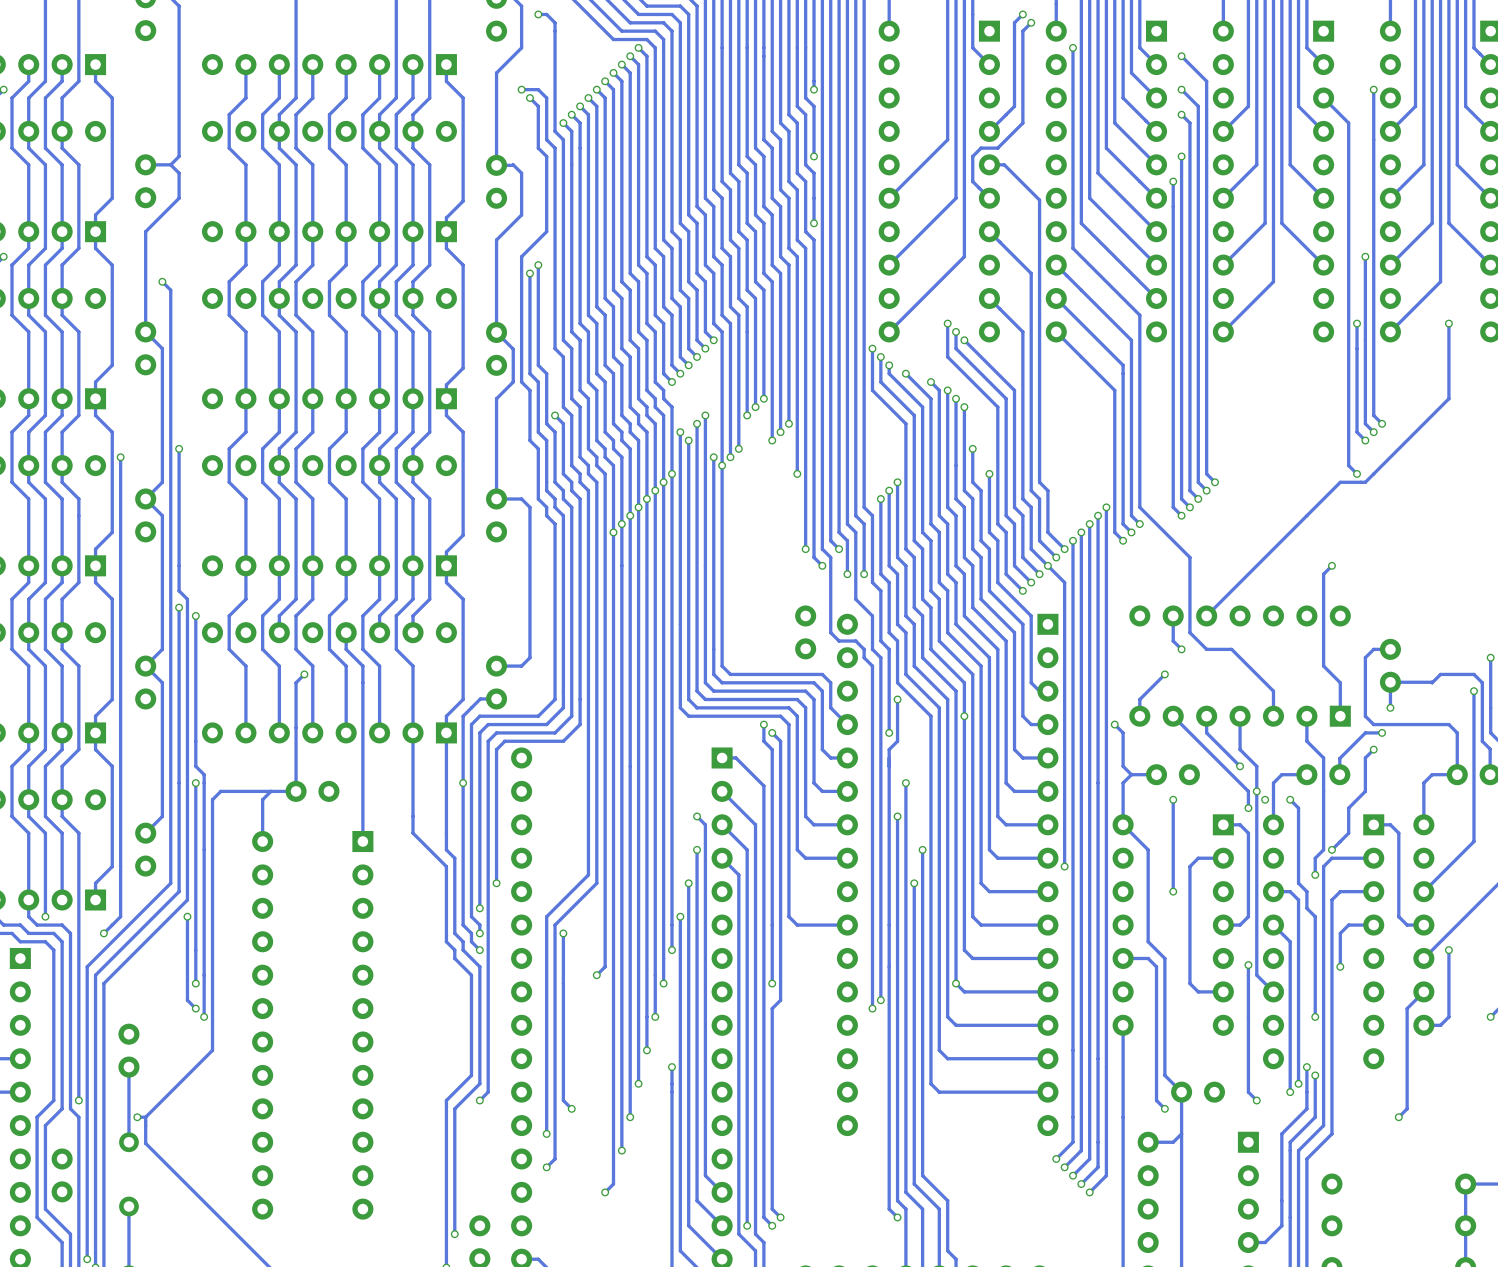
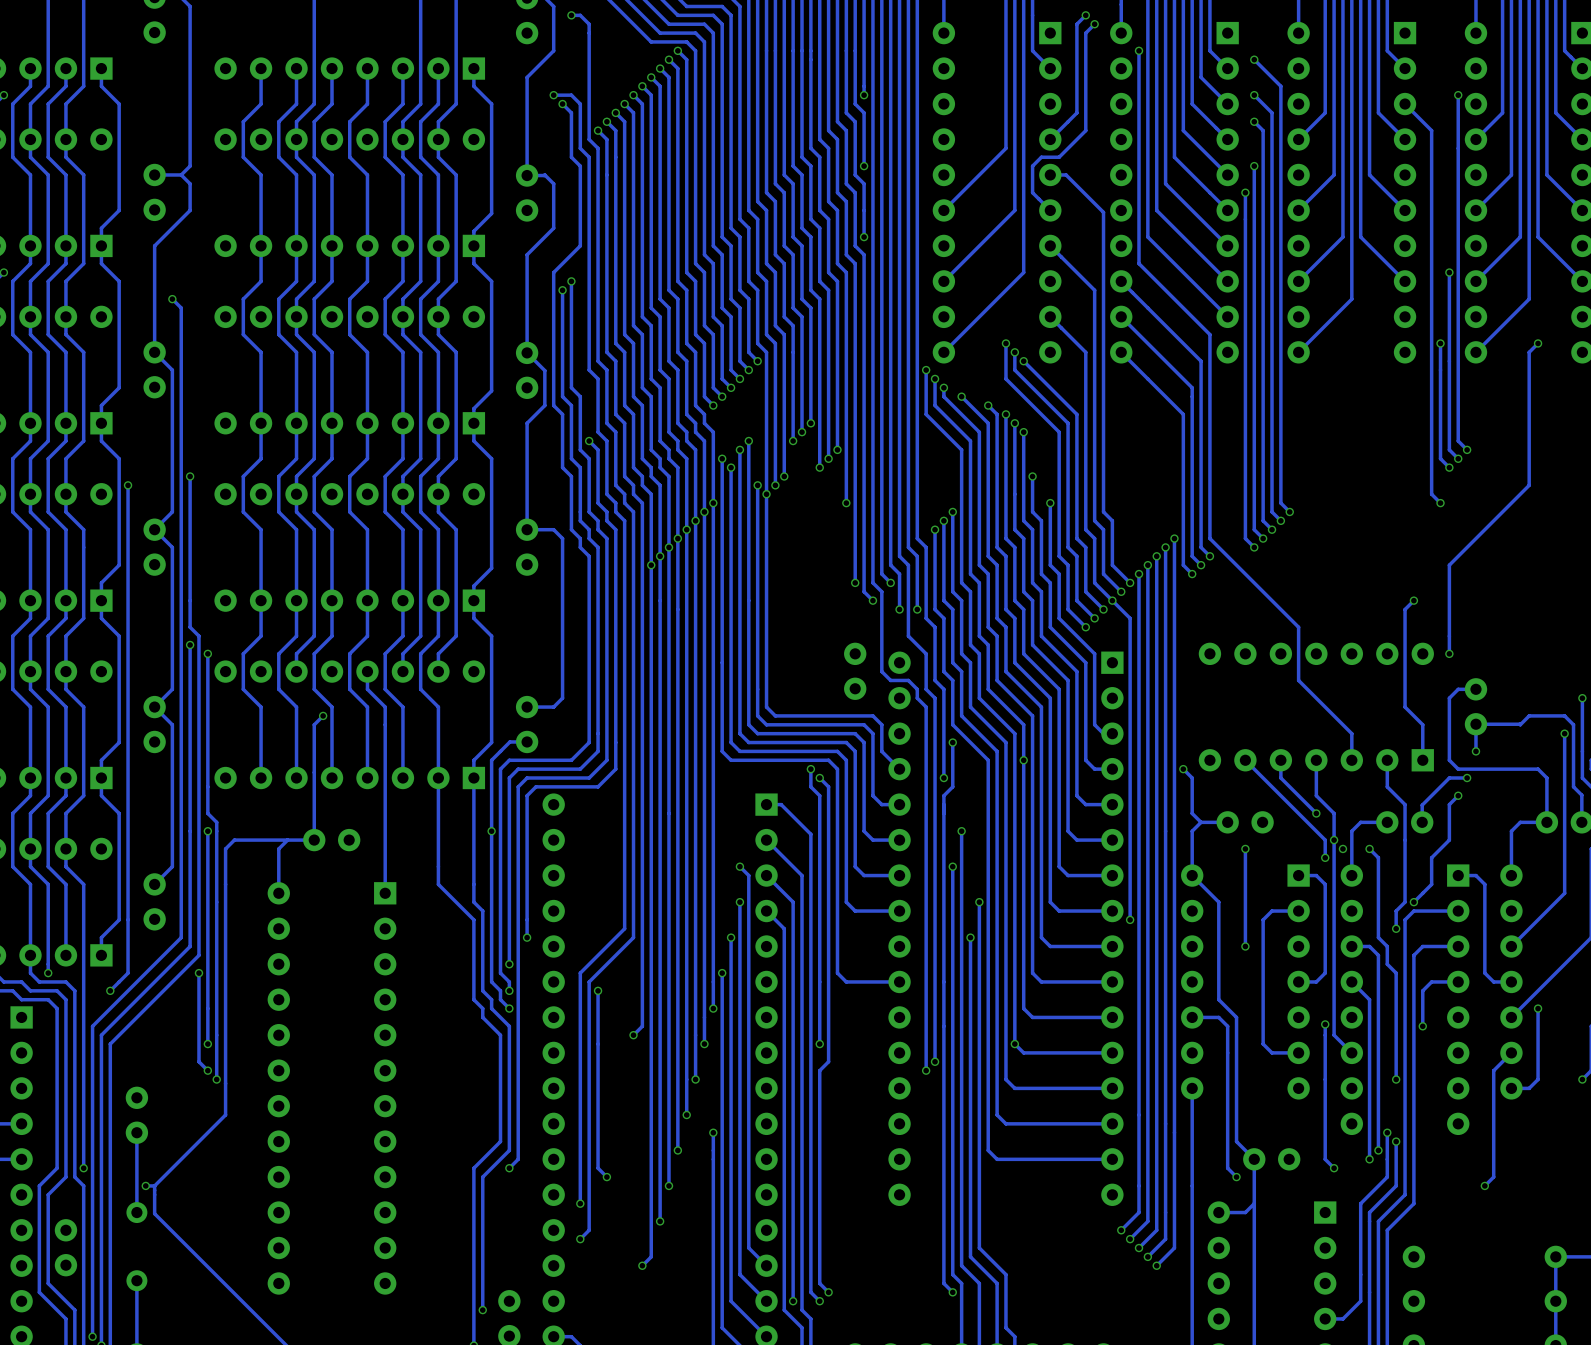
track: (1448, 323) (1448, 398) (1365, 482) (1340, 482) (1206, 615) -> (1538, 343) (1529, 352) (1529, 485) (1449, 565) (1449, 653)
track: (1189, 557) (1189, 632) (1206, 649) (1231, 649) -> (1263, 591) (1298, 627) (1298, 680) (1307, 689)
track: (1173, 615) (1173, 641) (1181, 649) -> none
via: none -> (1449, 653)
via: (1181, 649) -> none
track: (1164, 674) (1139, 699) (1139, 716) -> none
via: (1164, 674) -> none

